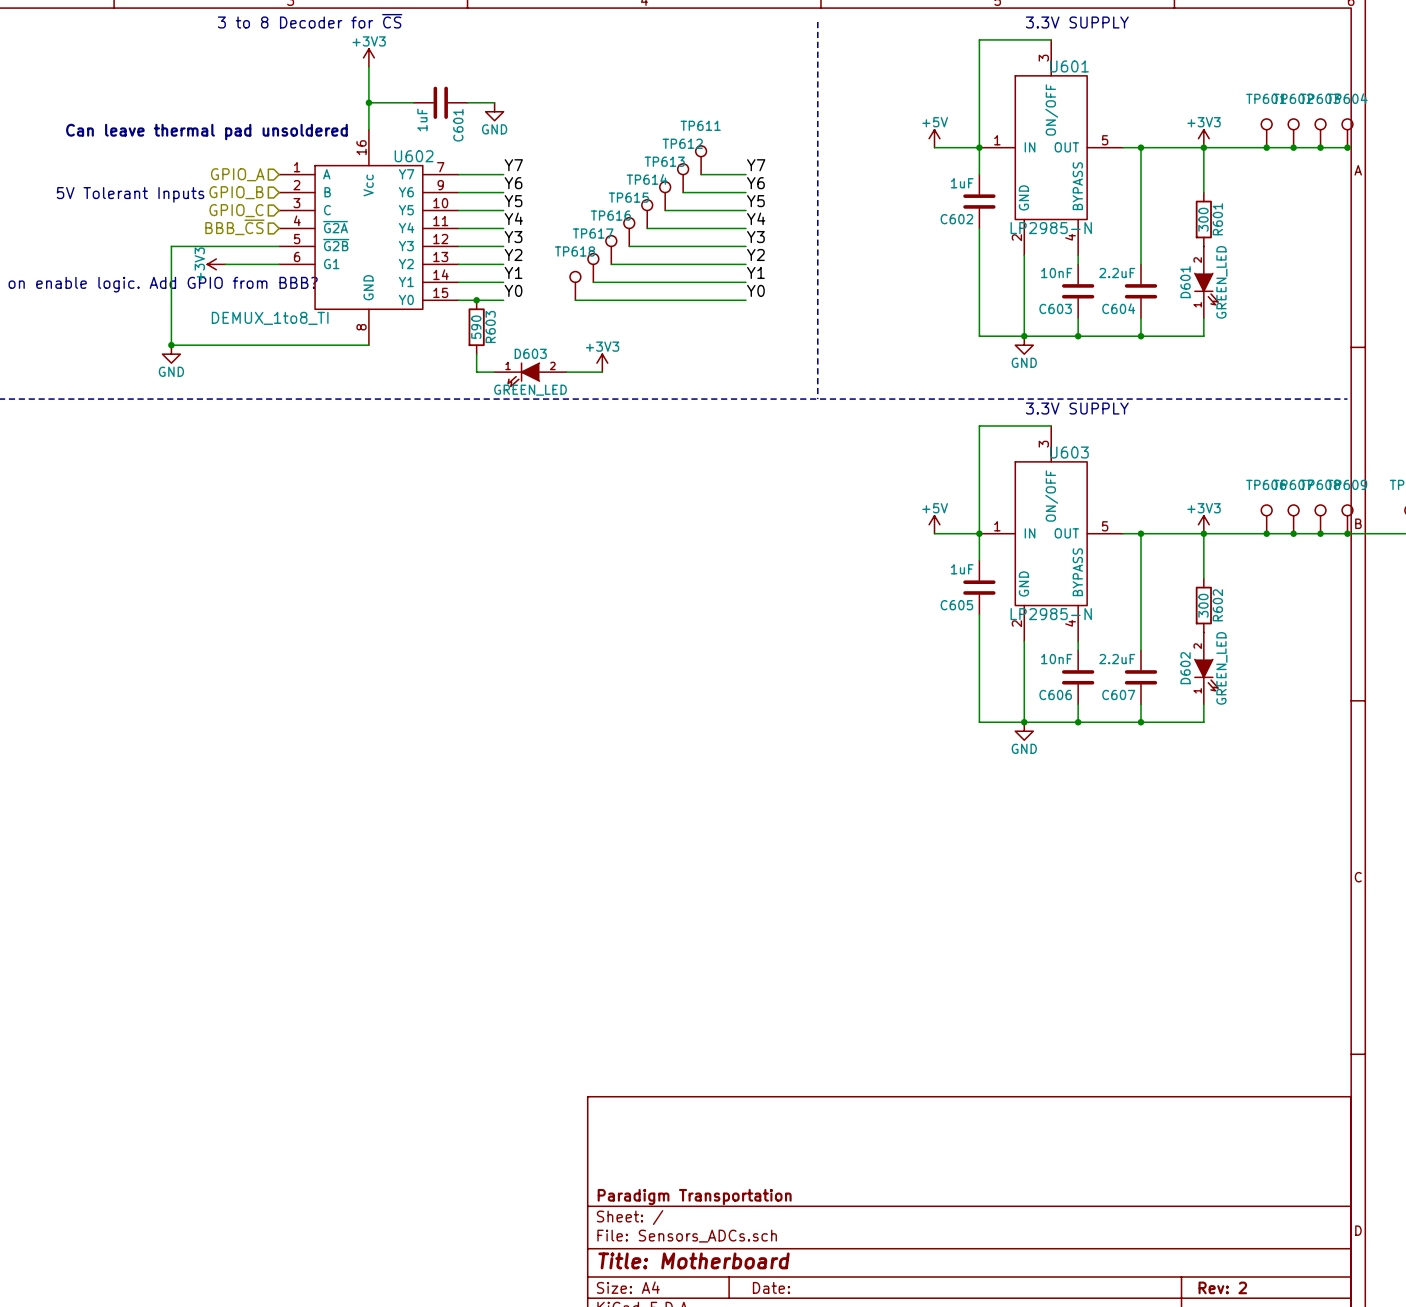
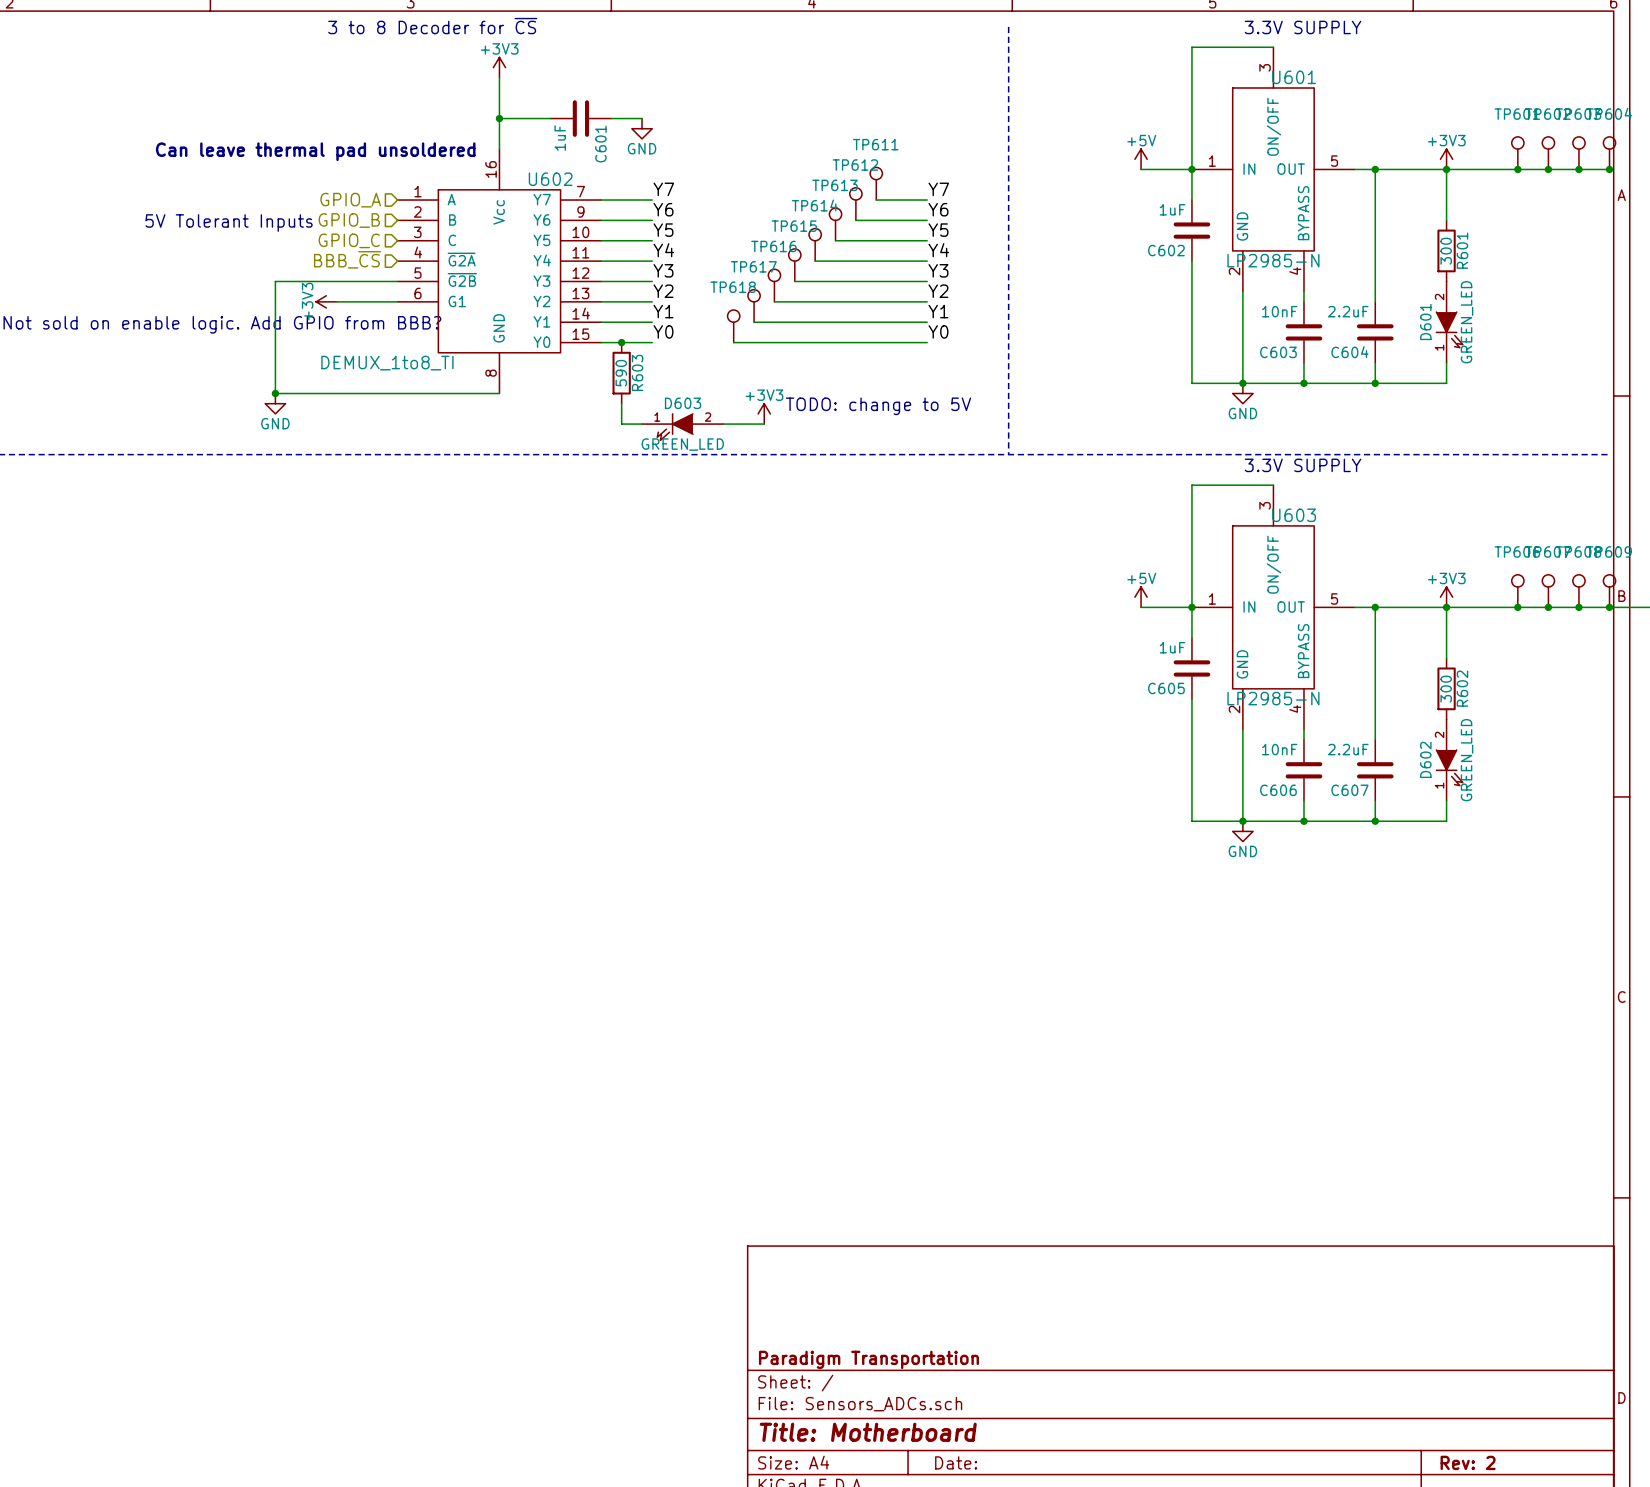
text: none -> TODO: change to 5V (878, 406)

